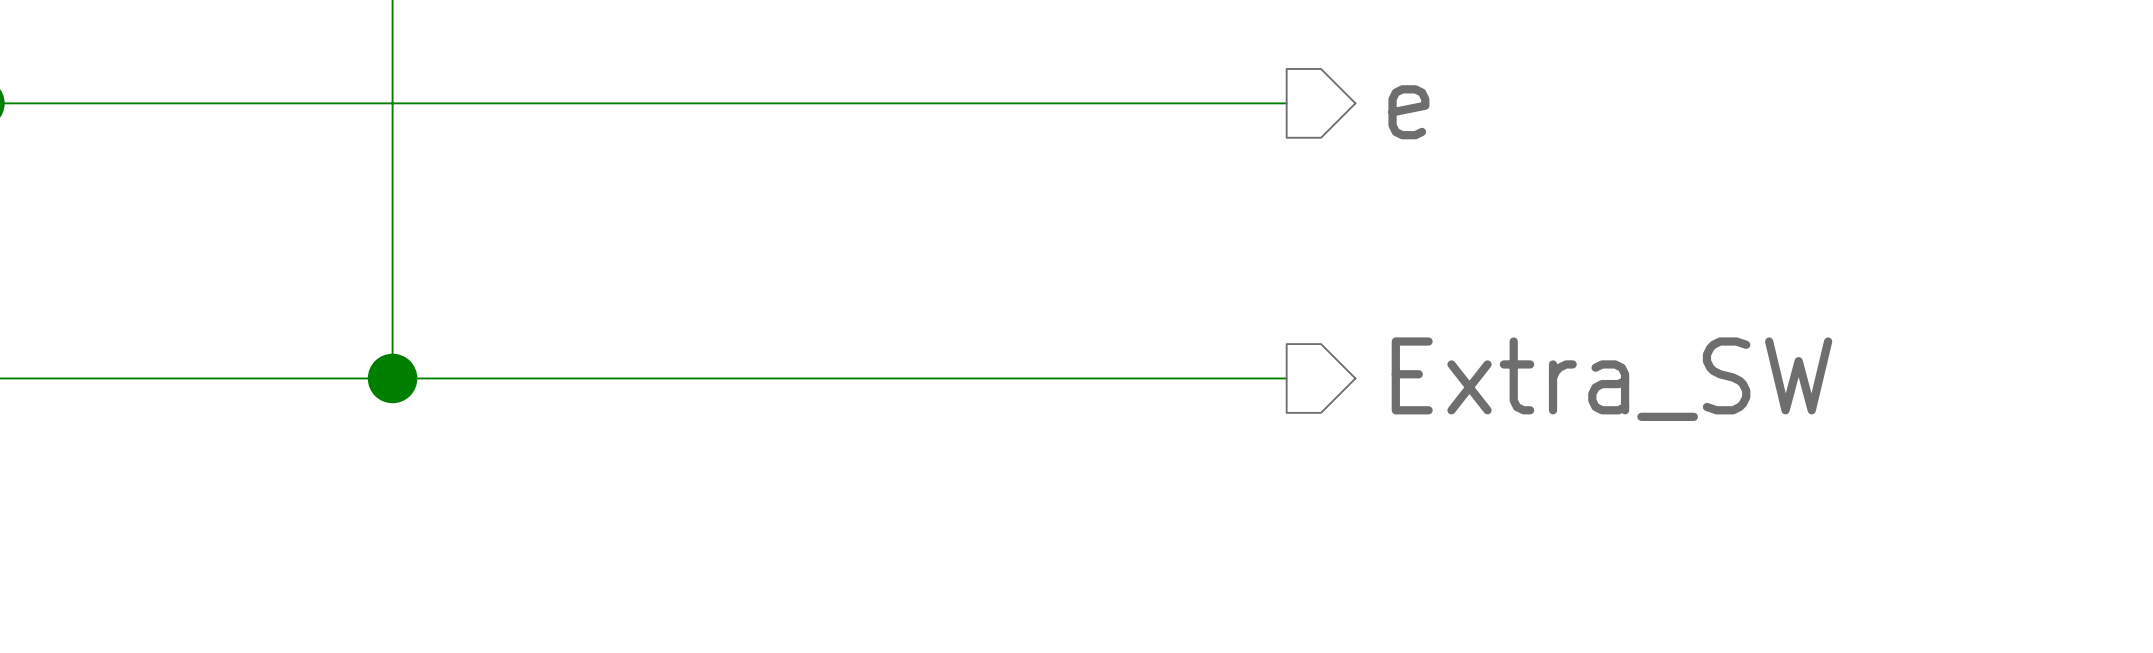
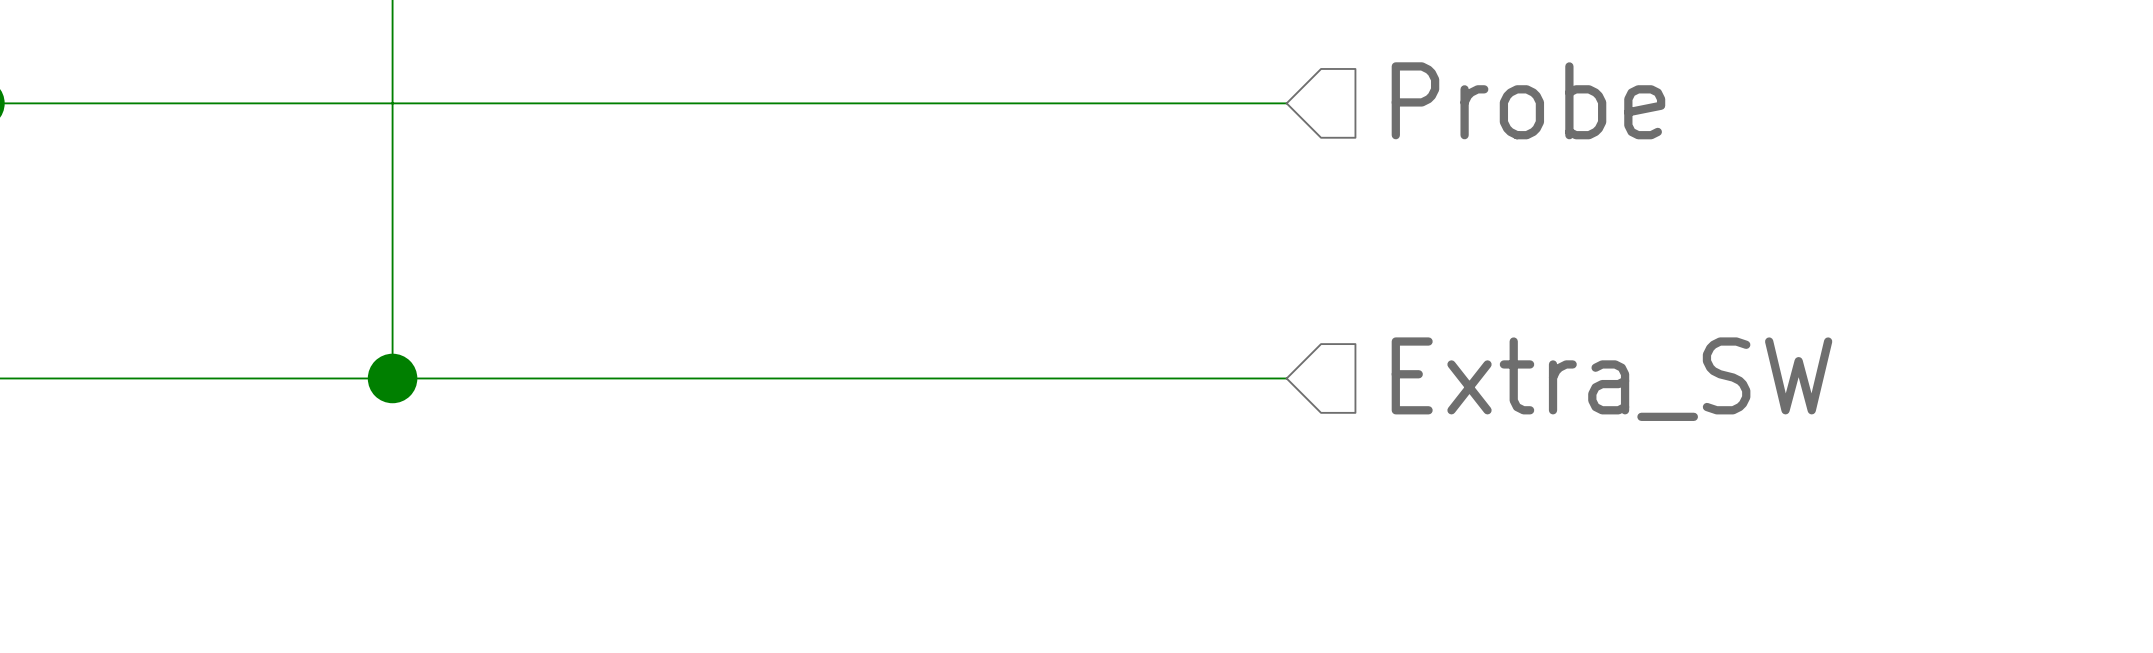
hierarchical label shape: output (1408, 112) -> input (1528, 100)
hierarchical label: e (1408, 112) -> Probe (1528, 100)
hierarchical label shape: output (1611, 379) -> input (1611, 379)

